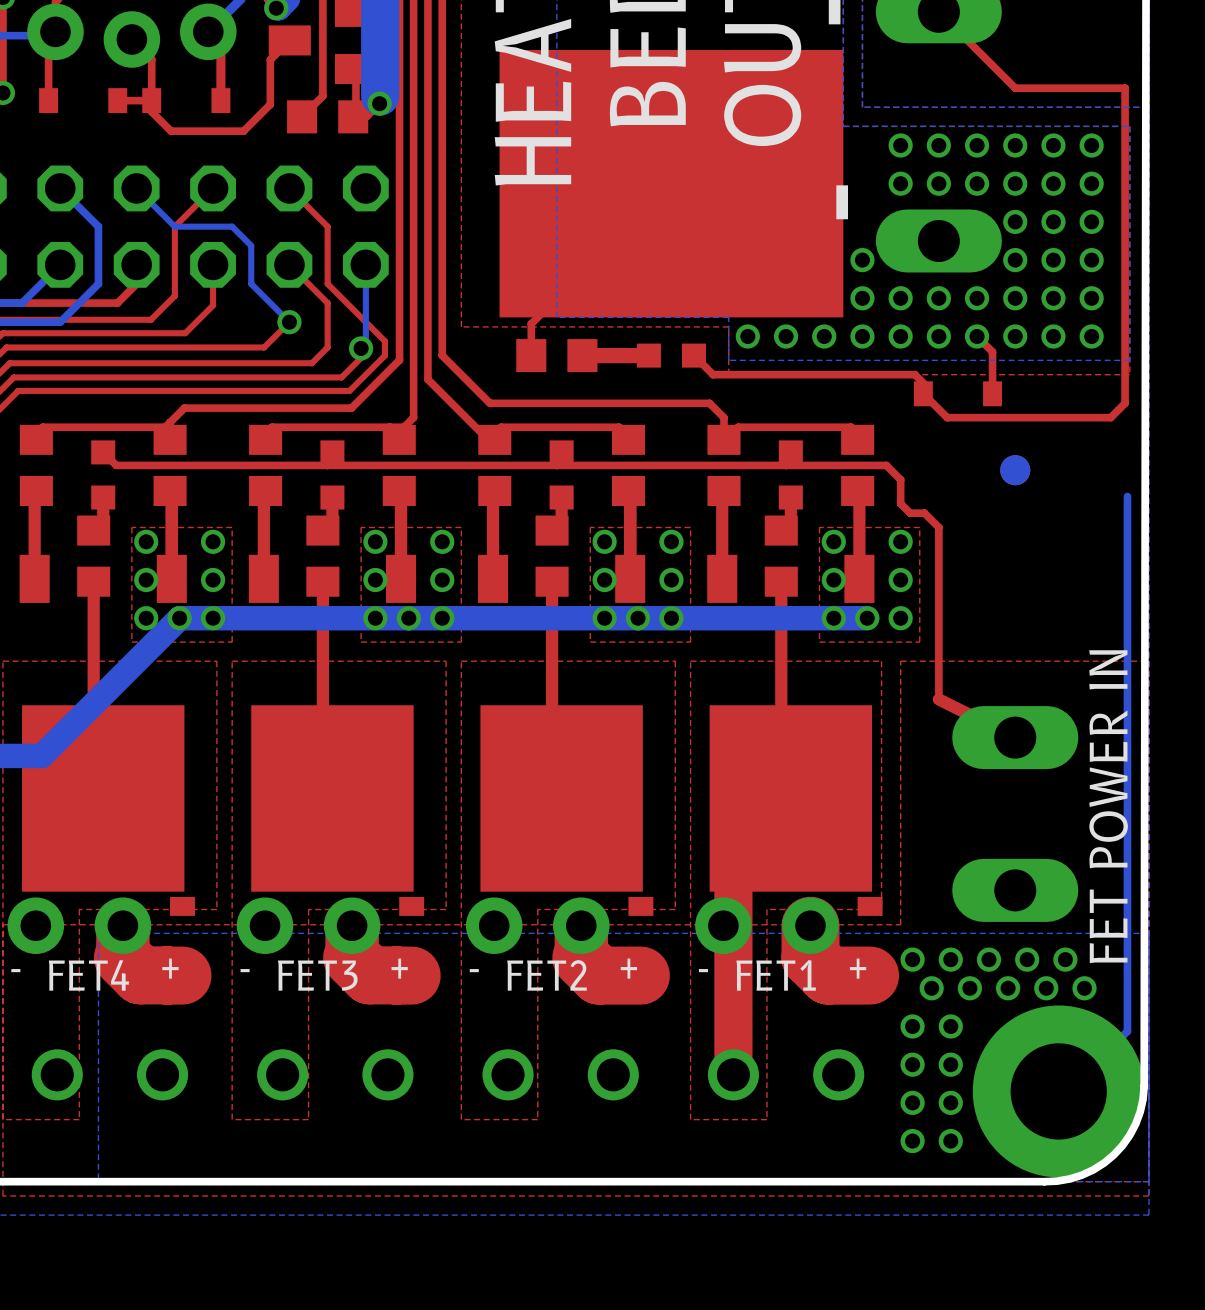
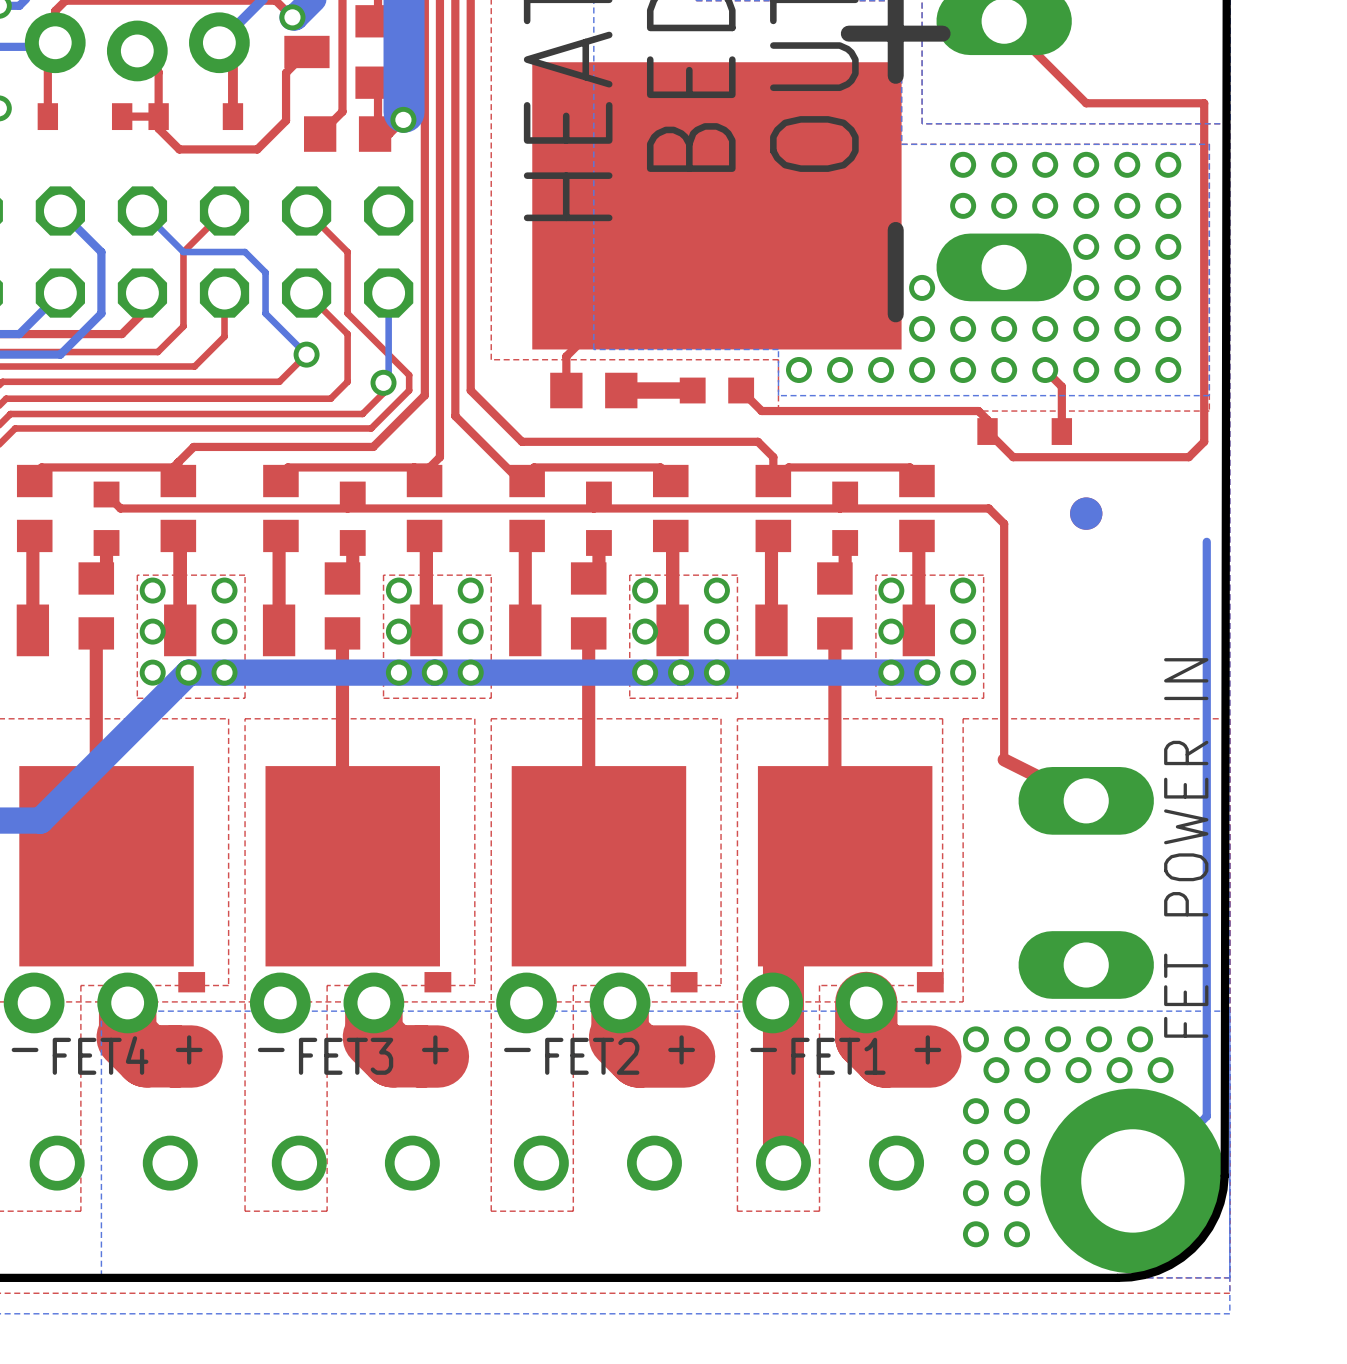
top track: (886, 465) (900, 479) (900, 503) (910, 513) (924, 513) (938, 527) -> (947, 508) (988, 508) (1004, 523) (1004, 575)

